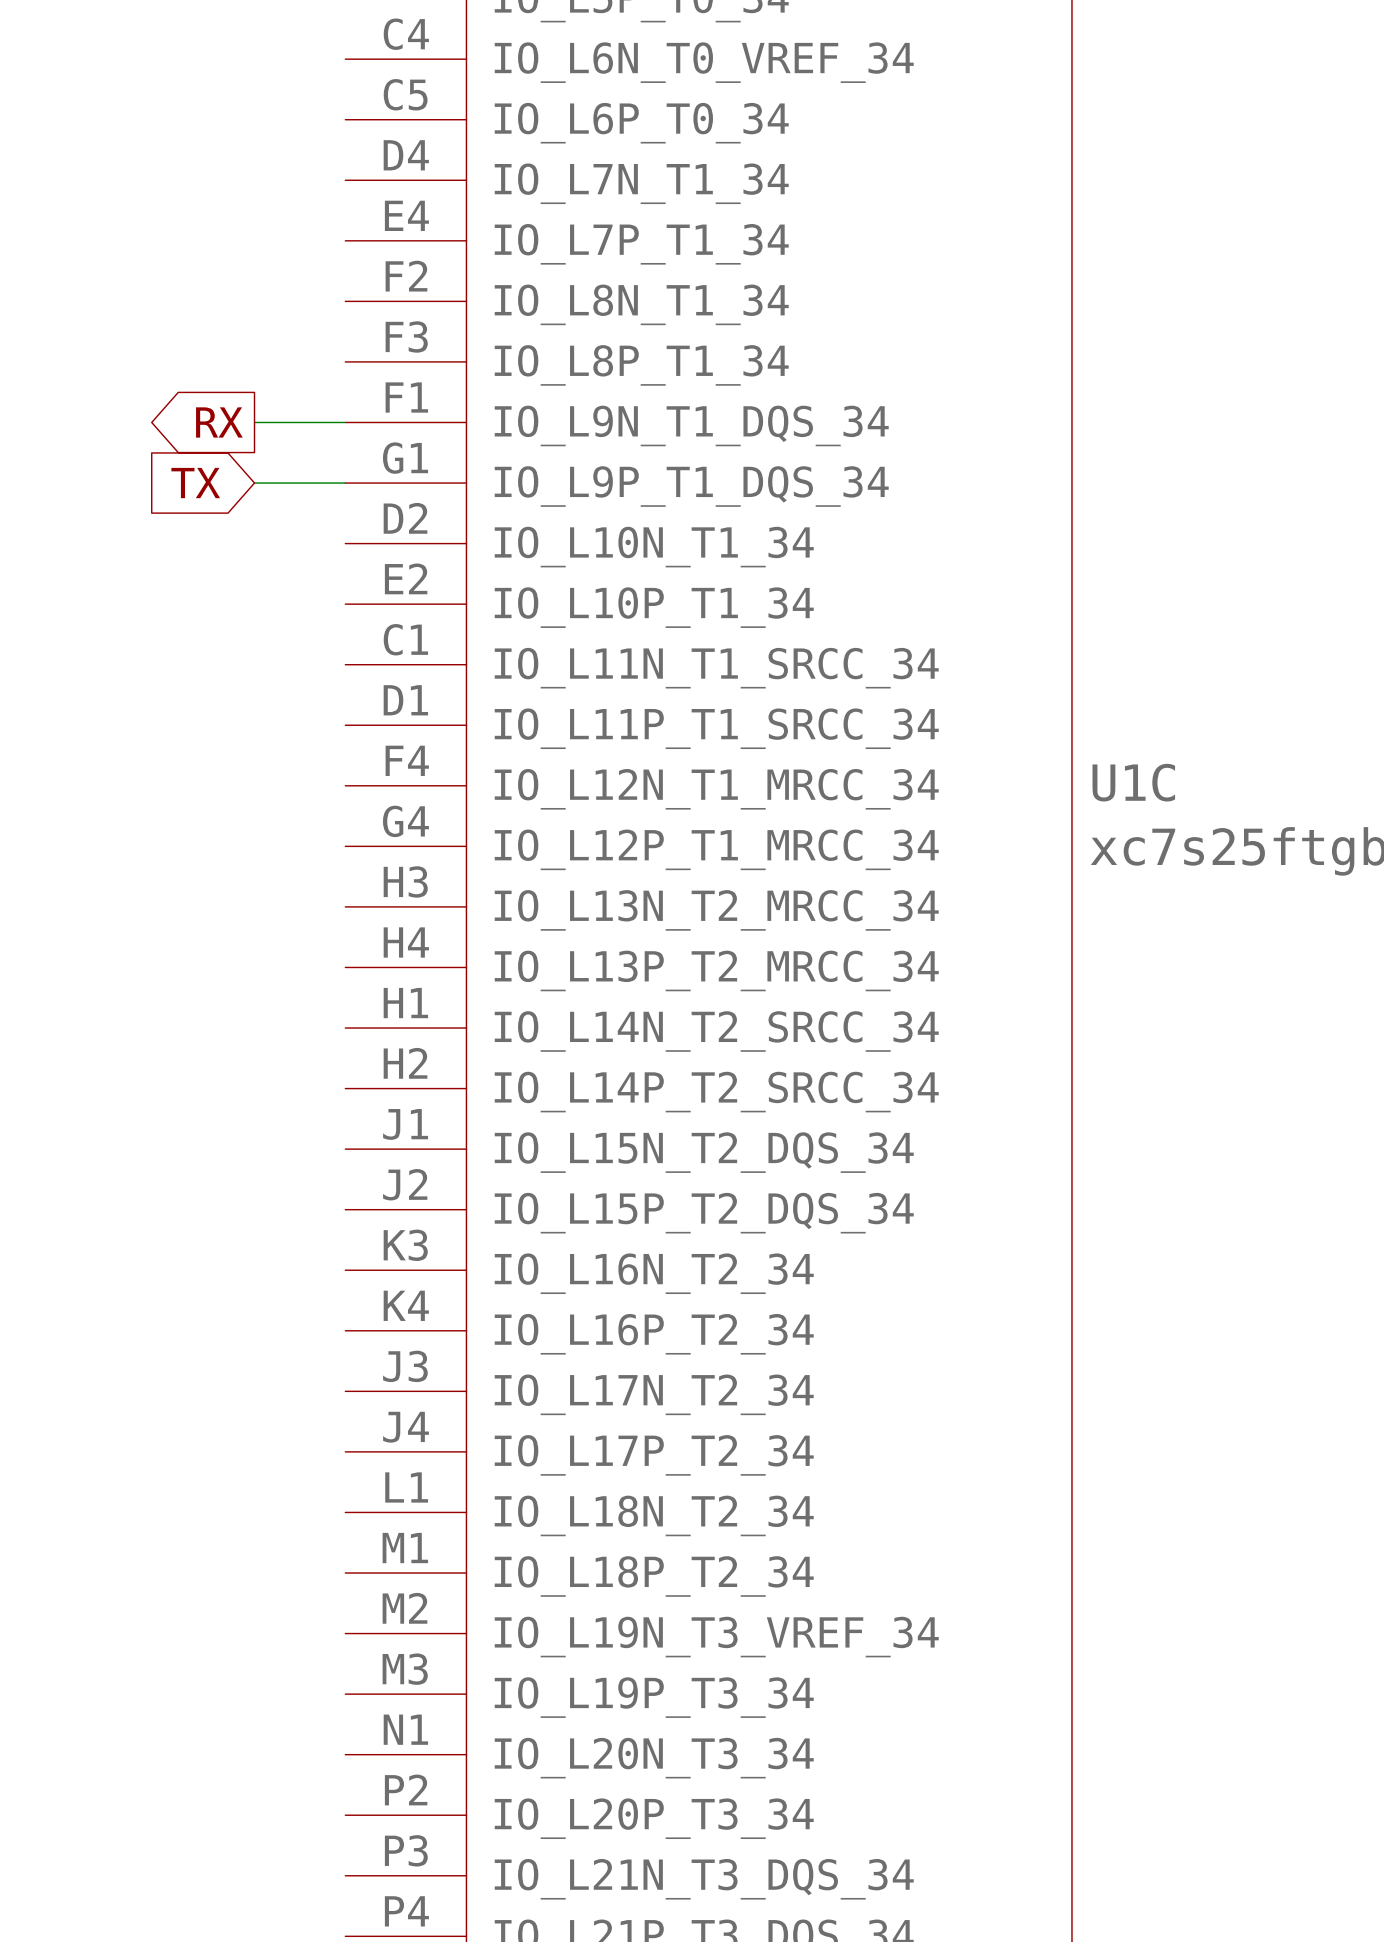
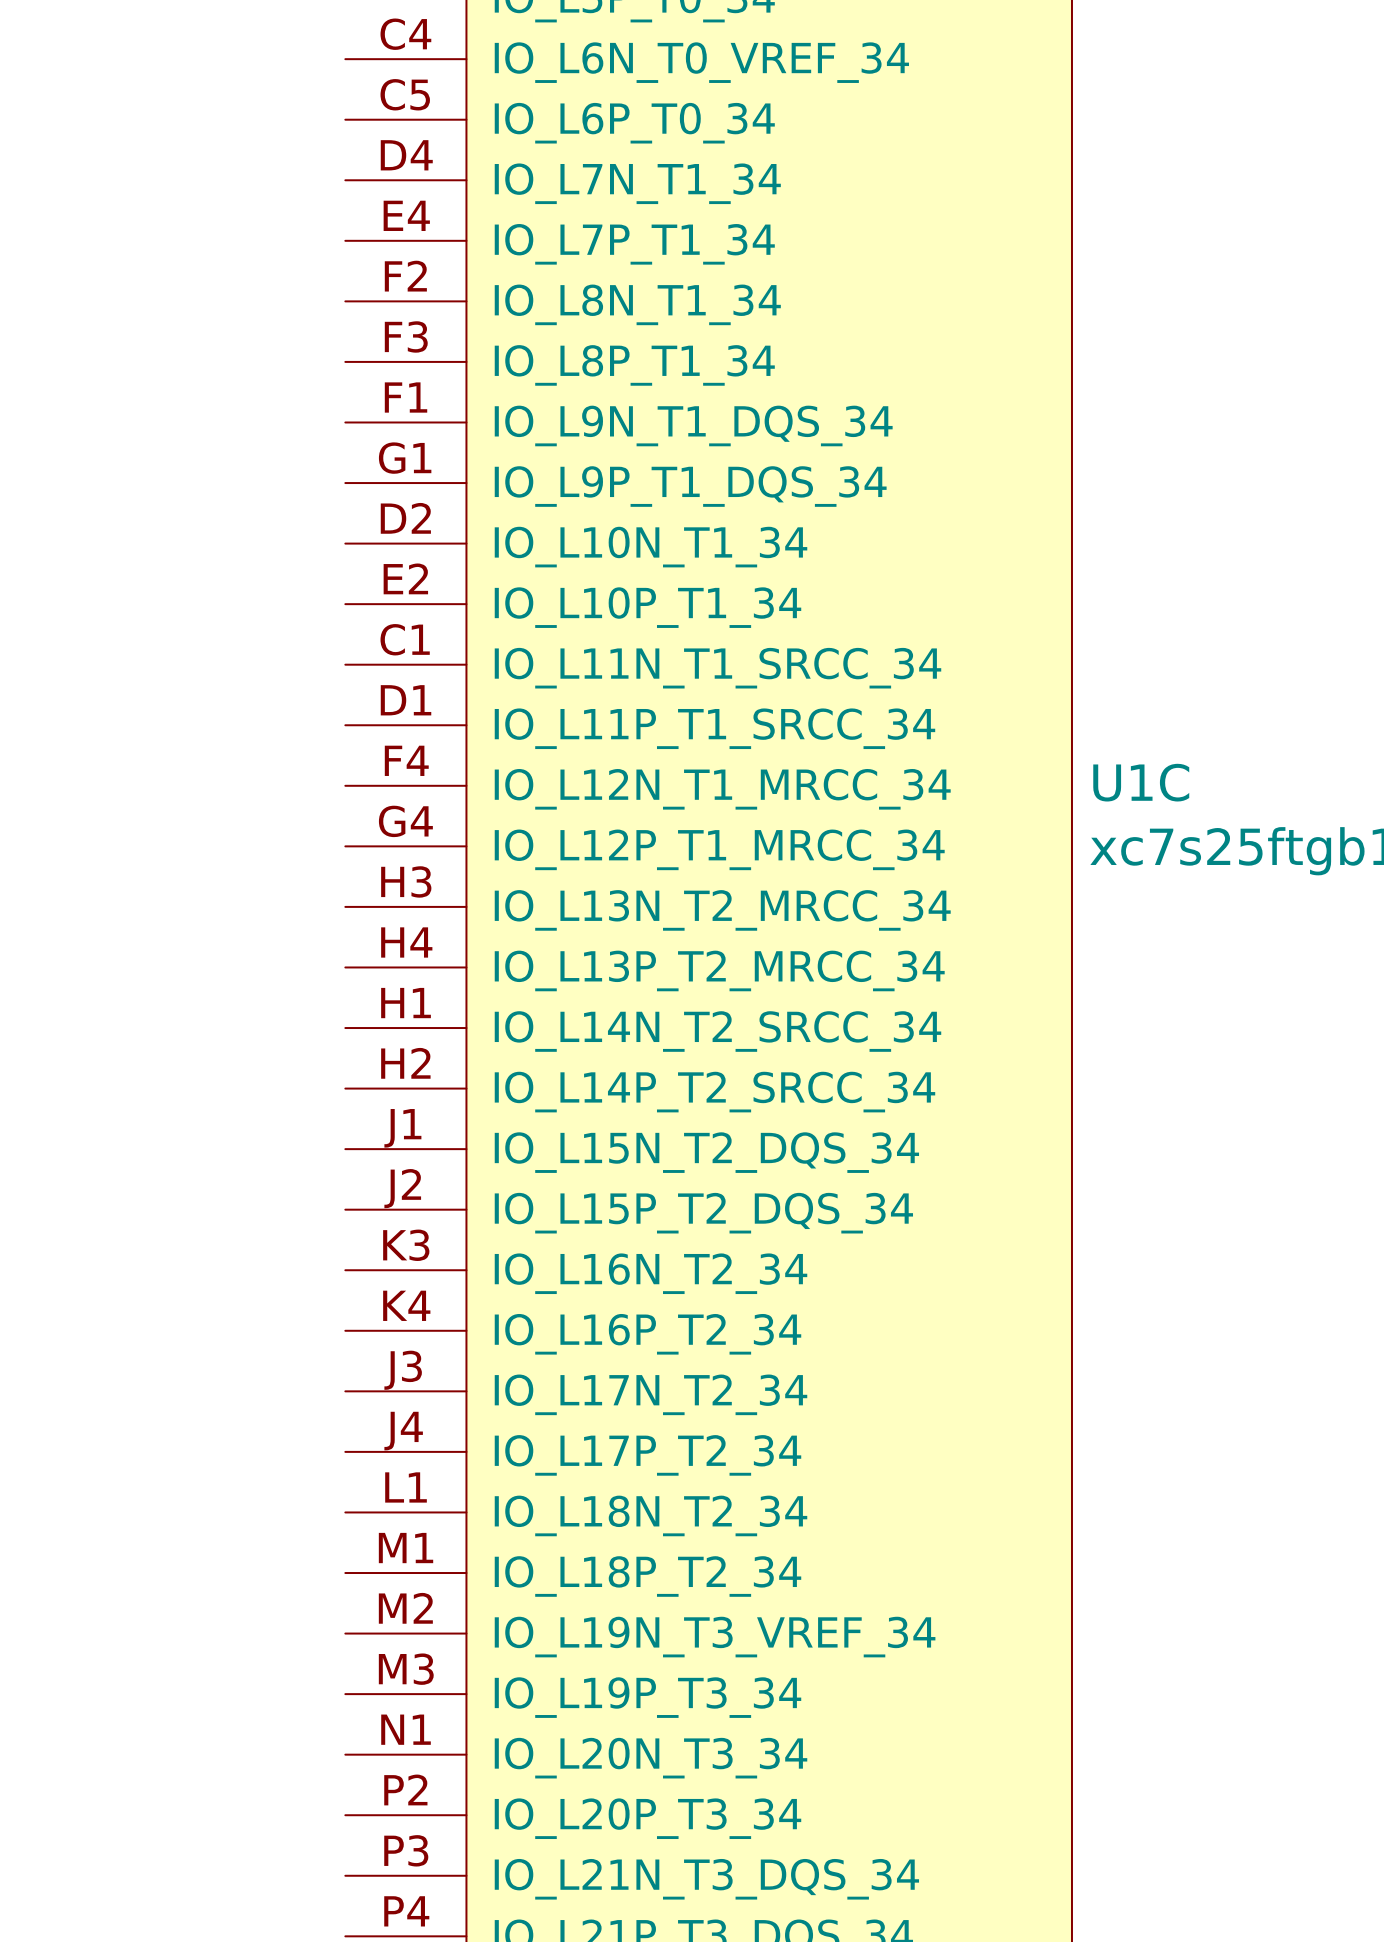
global label: RX (219, 422) -> none
wire: (254, 422) (345, 422) -> none
global label: TX (195, 483) -> none
wire: (254, 483) (345, 483) -> none

